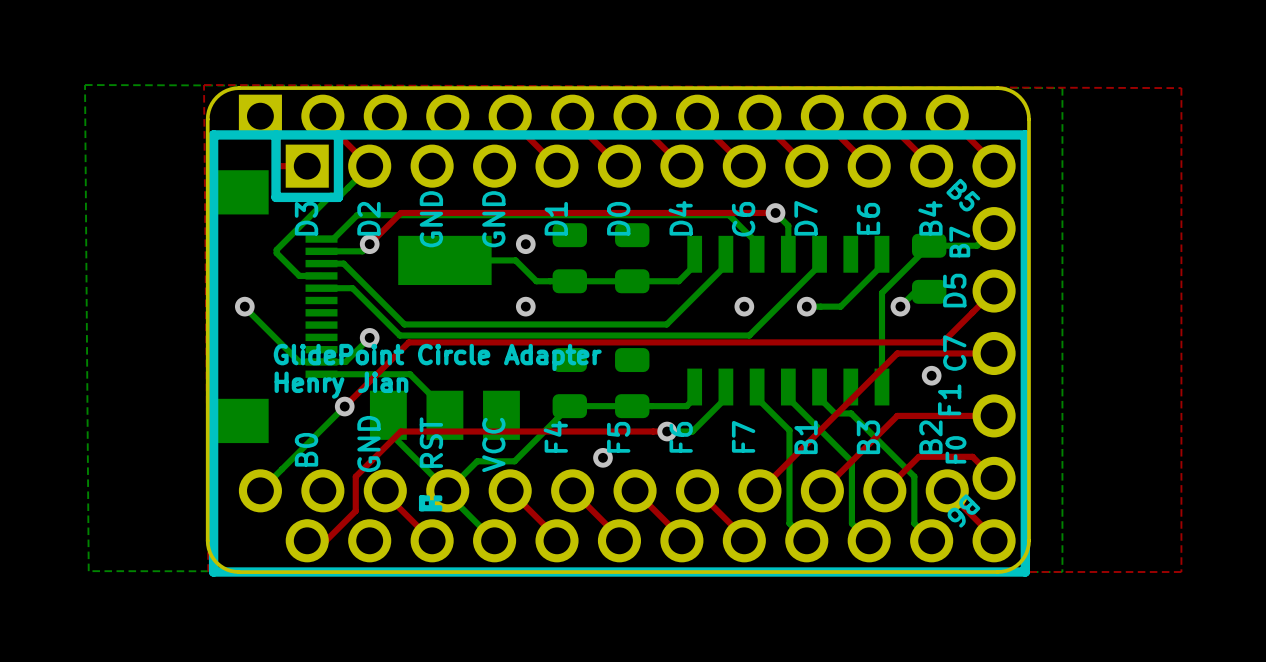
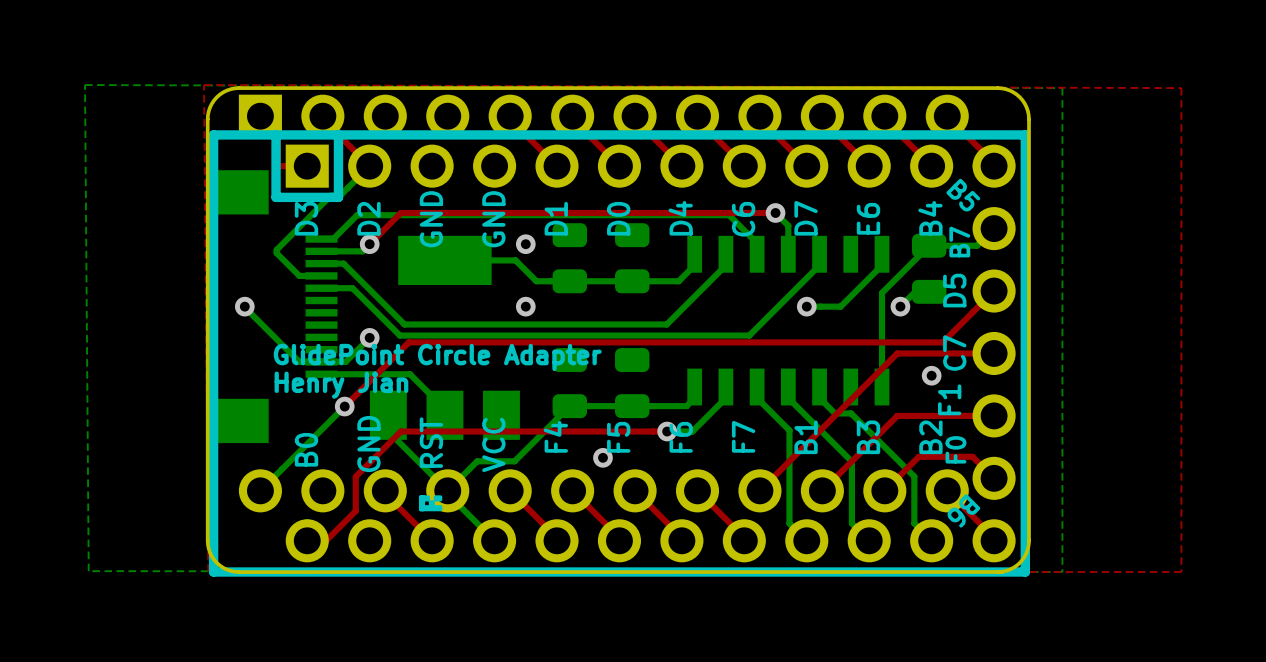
via: (744, 306) -> none

